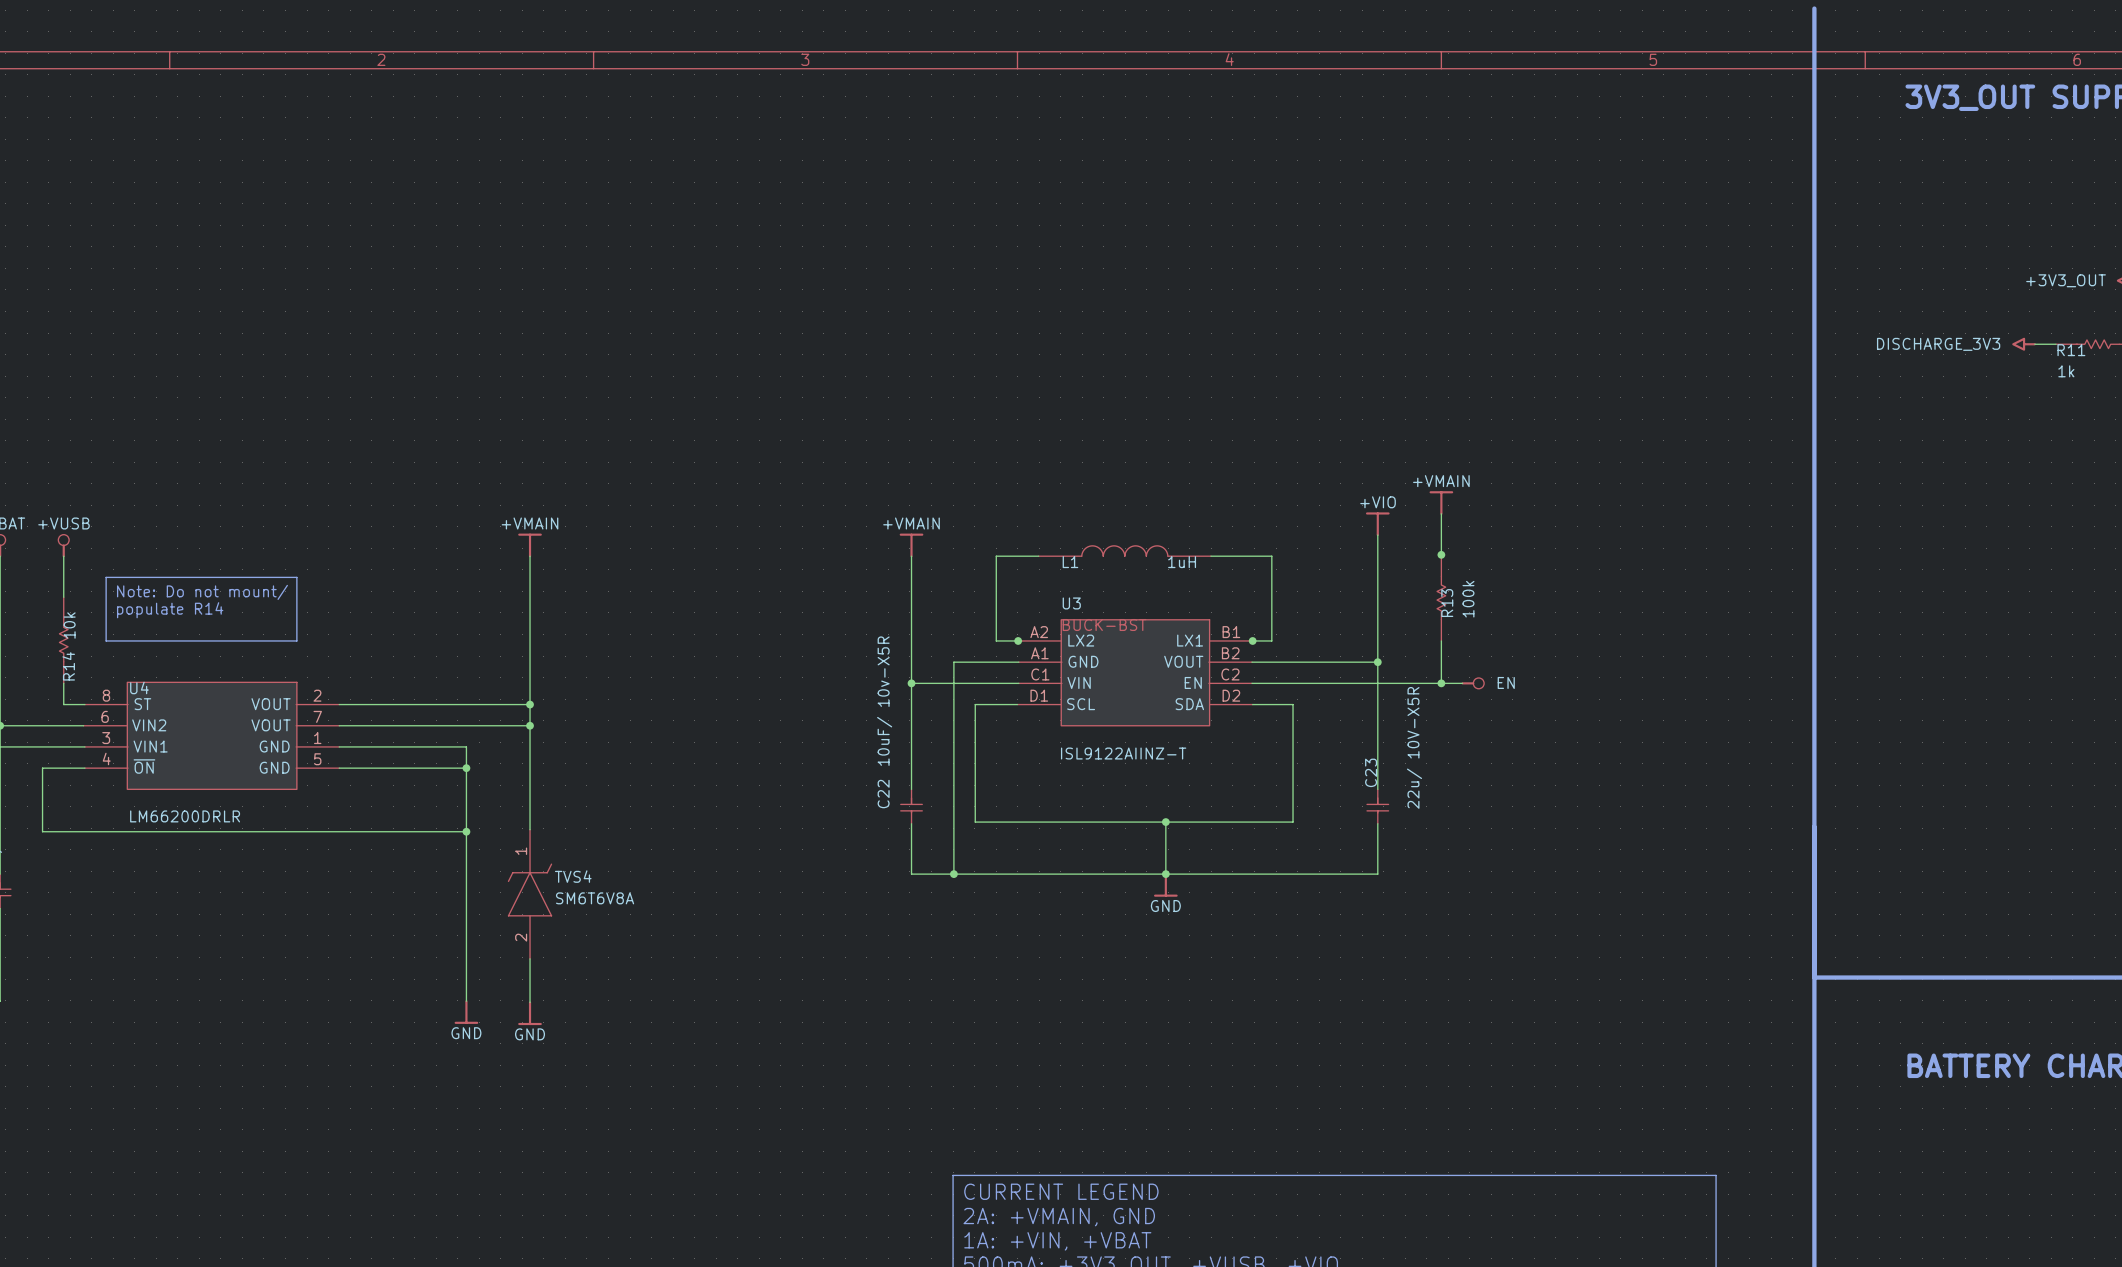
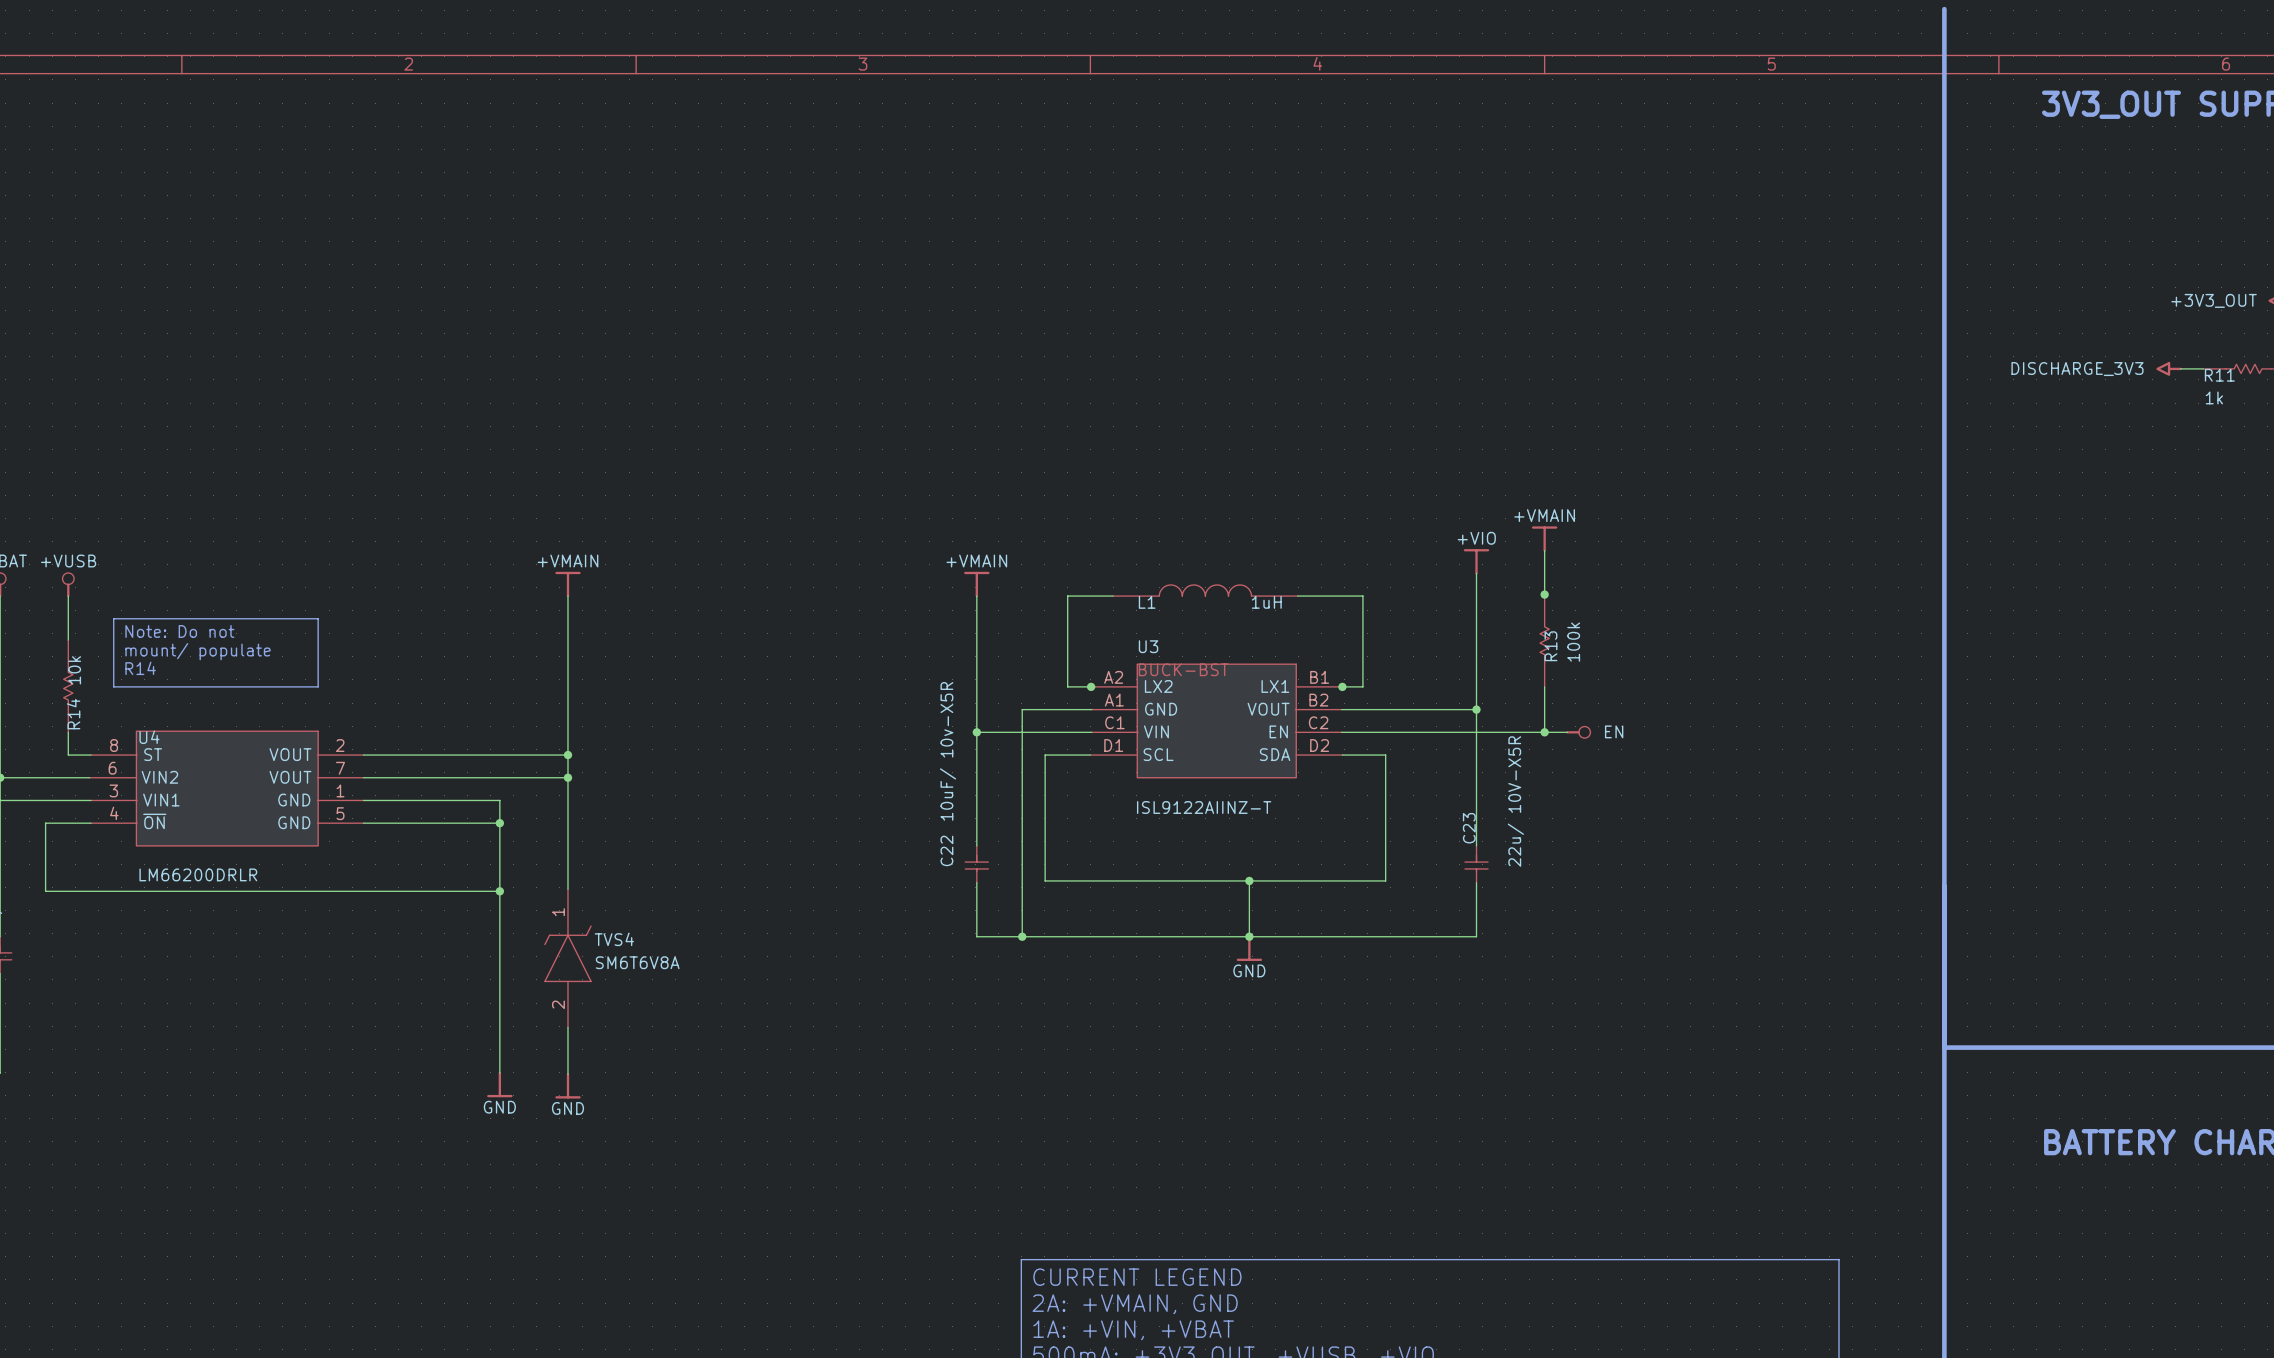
text: Note: Do not mount/ (202, 592) -> Note: Do not (179, 631)
text: populate R14 (170, 610) -> mount/ populate (198, 651)
text: none -> R14 (140, 668)

